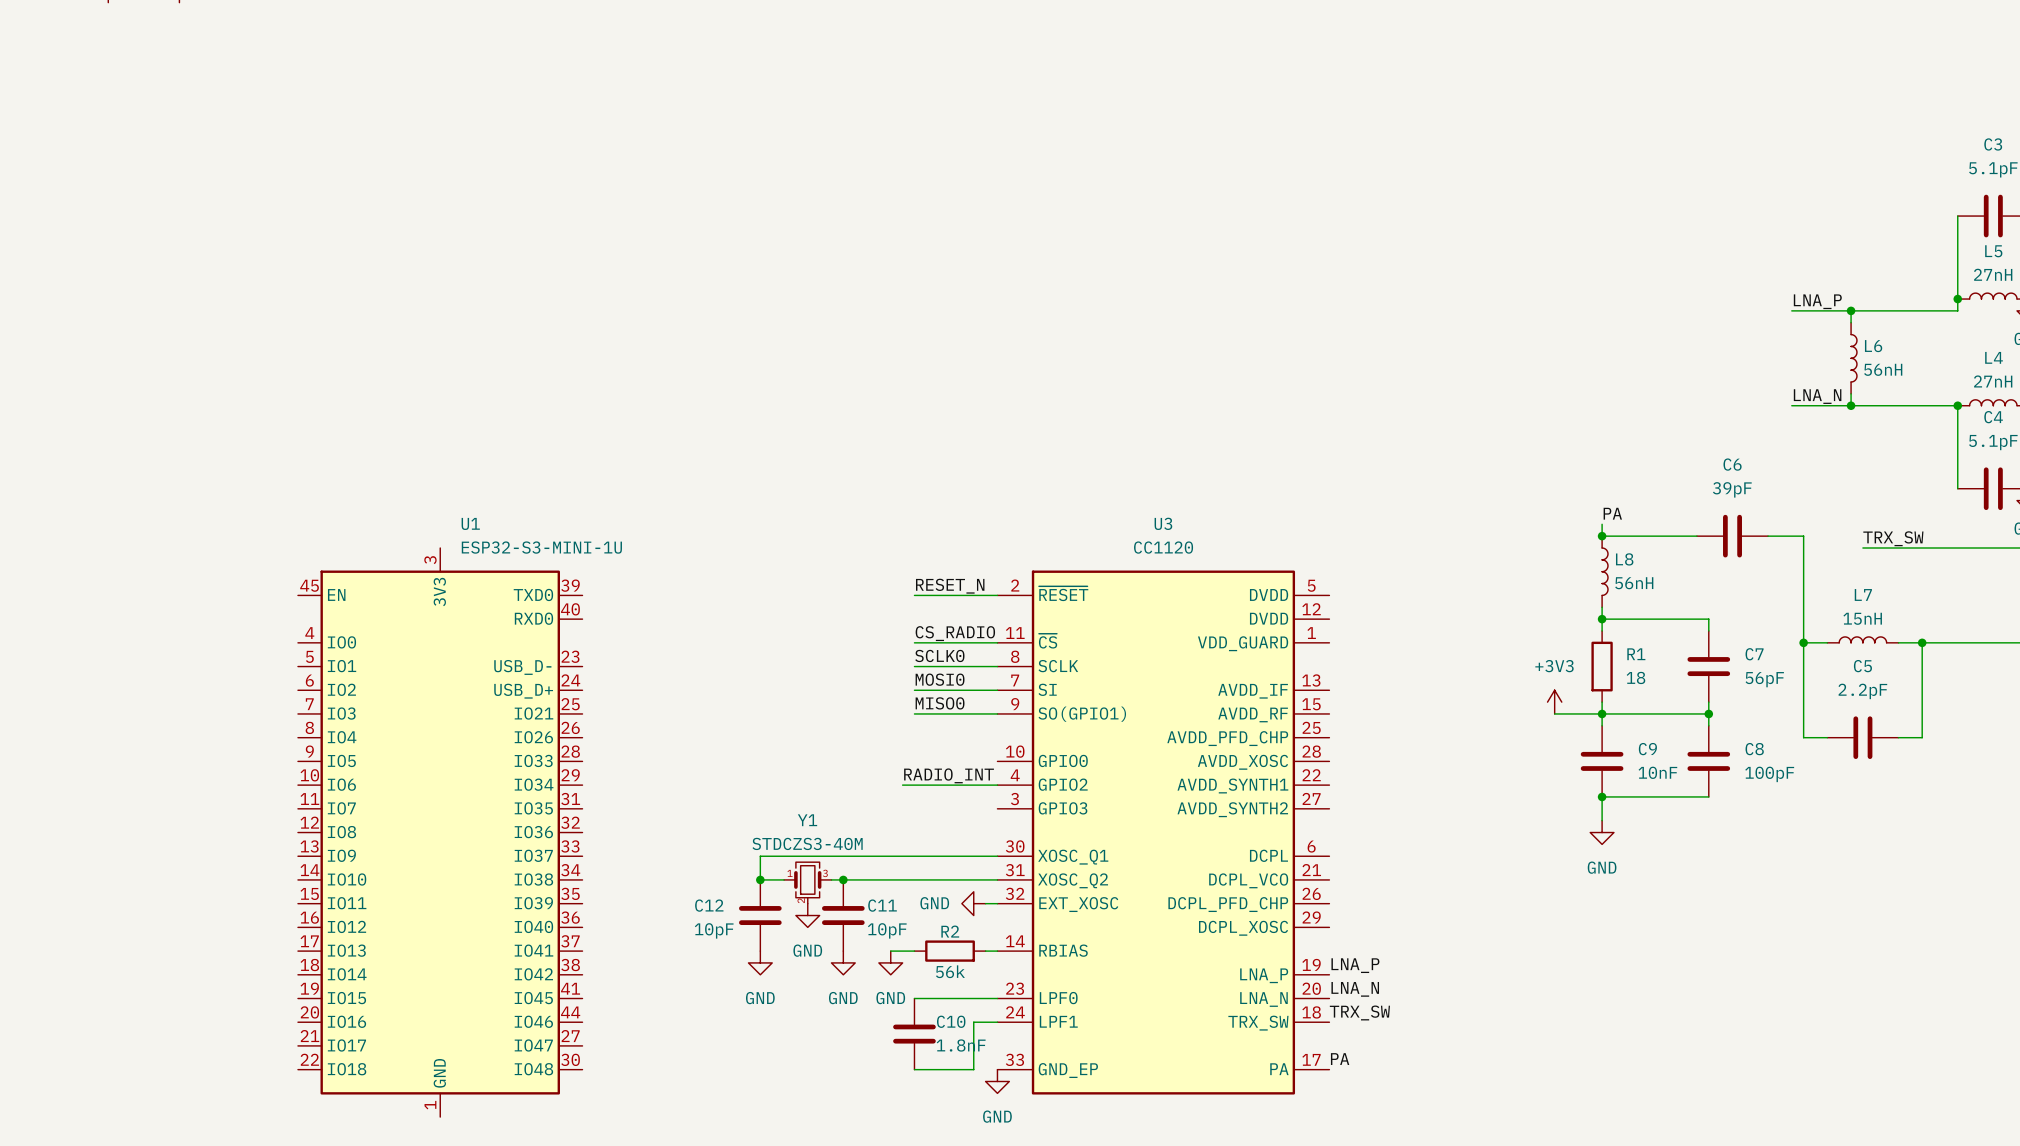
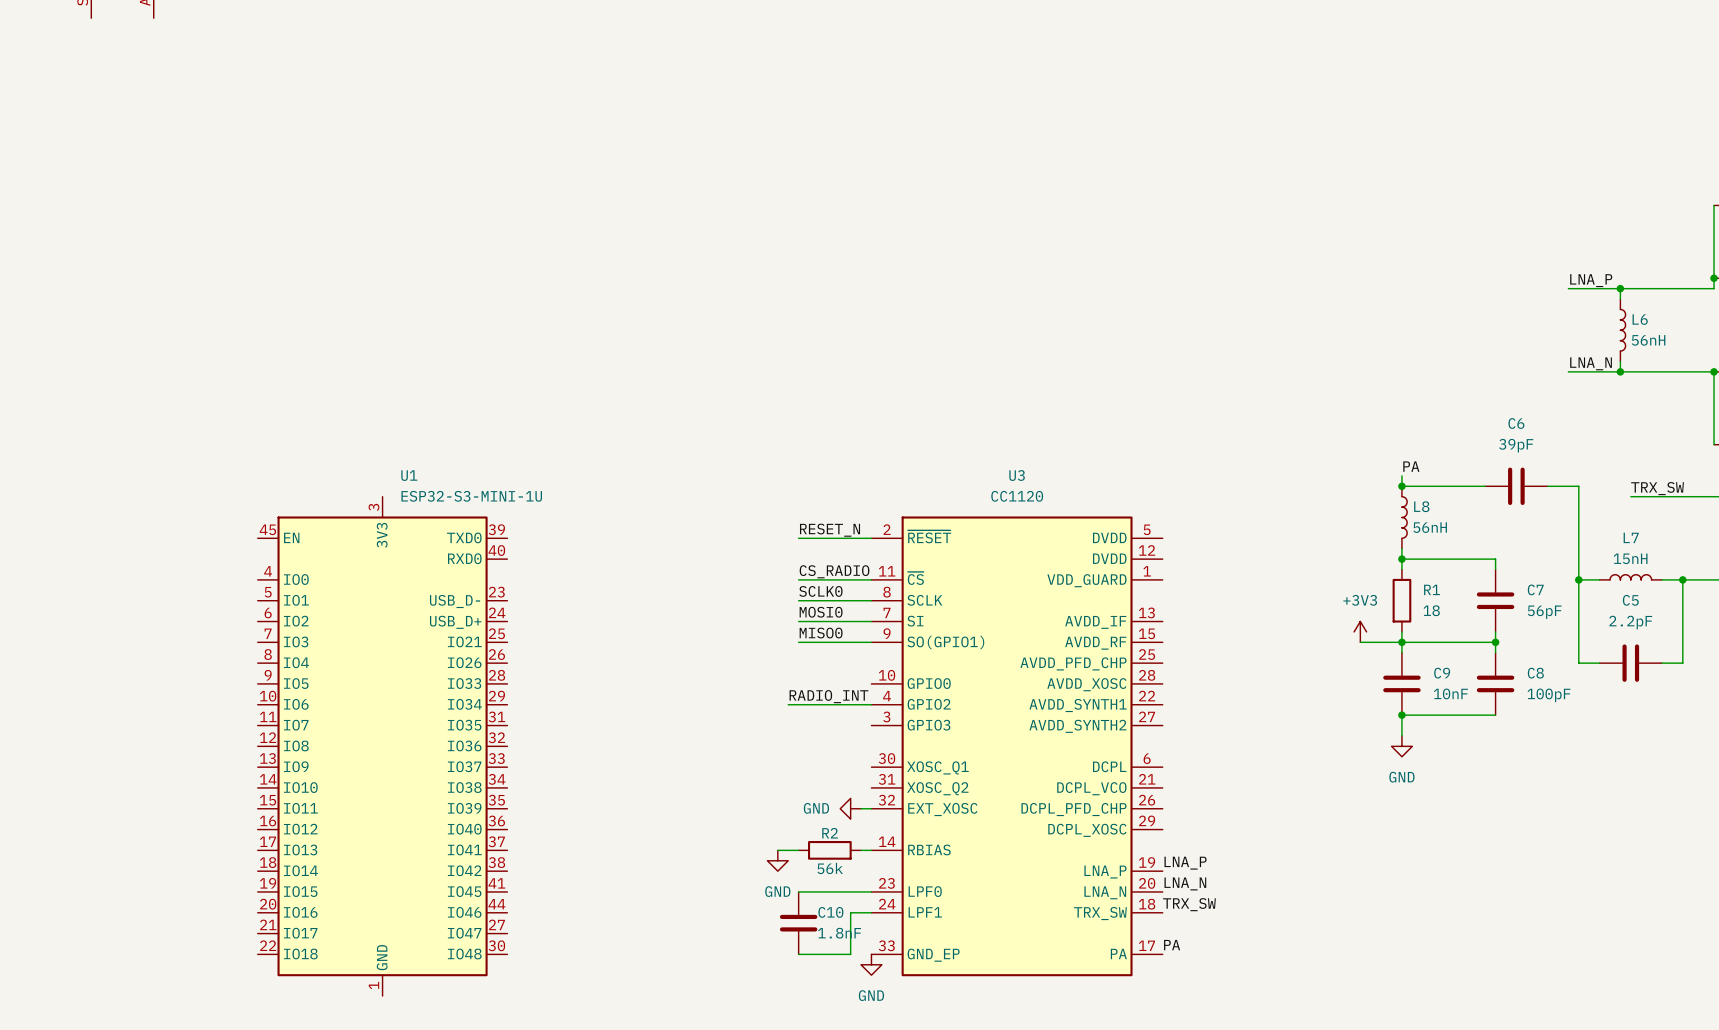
wire: (997, 856) (760, 856) (760, 879) (784, 879) -> none
junction: (760, 879) -> none
wire: (831, 879) (997, 879) -> none
junction: (843, 879) -> none
Y1: STDCZS3-40M (807, 882) -> none
C12: 10pF (760, 915) -> none
power symbol: GND (807, 915) -> none
C11: 10pF (843, 915) -> none
power symbol: GND (760, 962) -> none
power symbol: GND (843, 962) -> none

